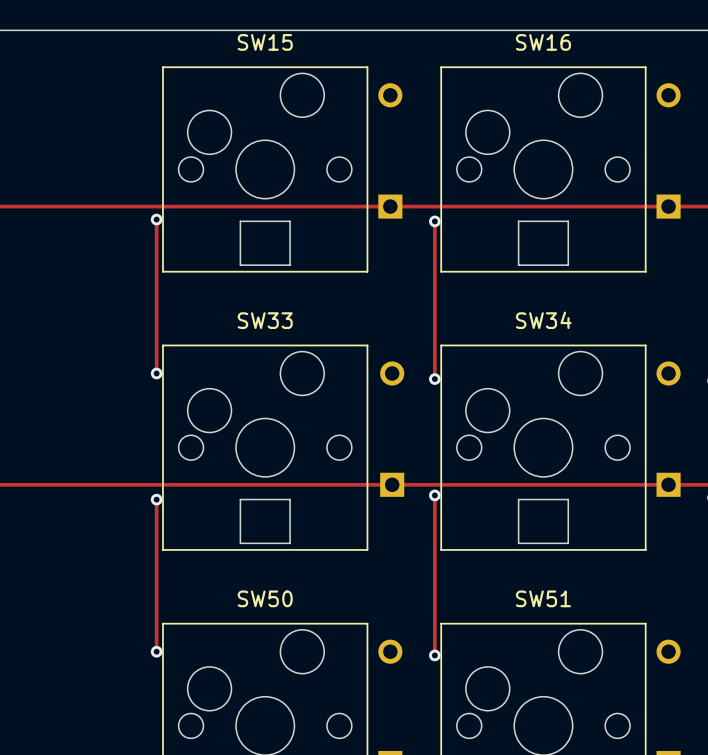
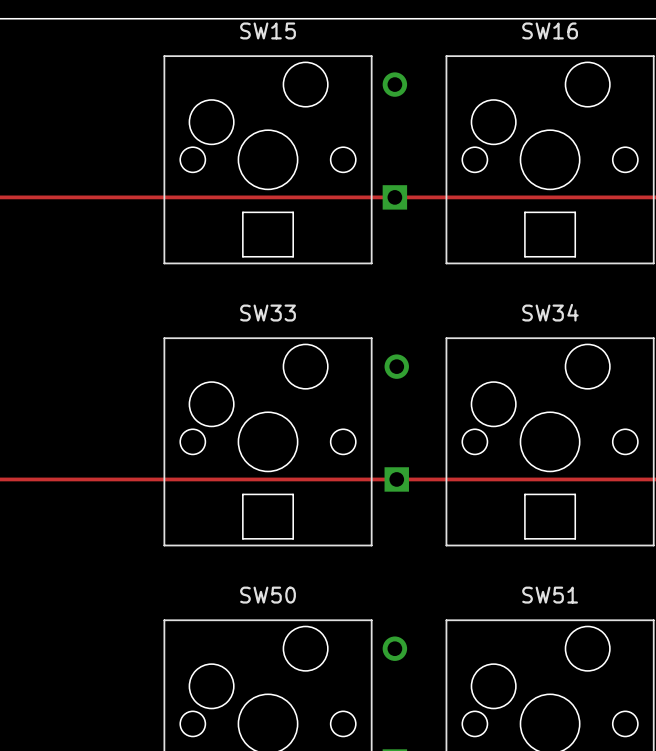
track: (156, 219) (156, 373) -> none
via: (156, 219) -> none
track: (434, 221) (434, 379) -> none
via: (434, 221) -> none
via: (156, 373) -> none
via: (434, 379) -> none
track: (434, 495) (434, 655) -> none
via: (434, 495) -> none
track: (156, 499) (156, 651) -> none
via: (156, 499) -> none
via: (156, 651) -> none
via: (434, 655) -> none

